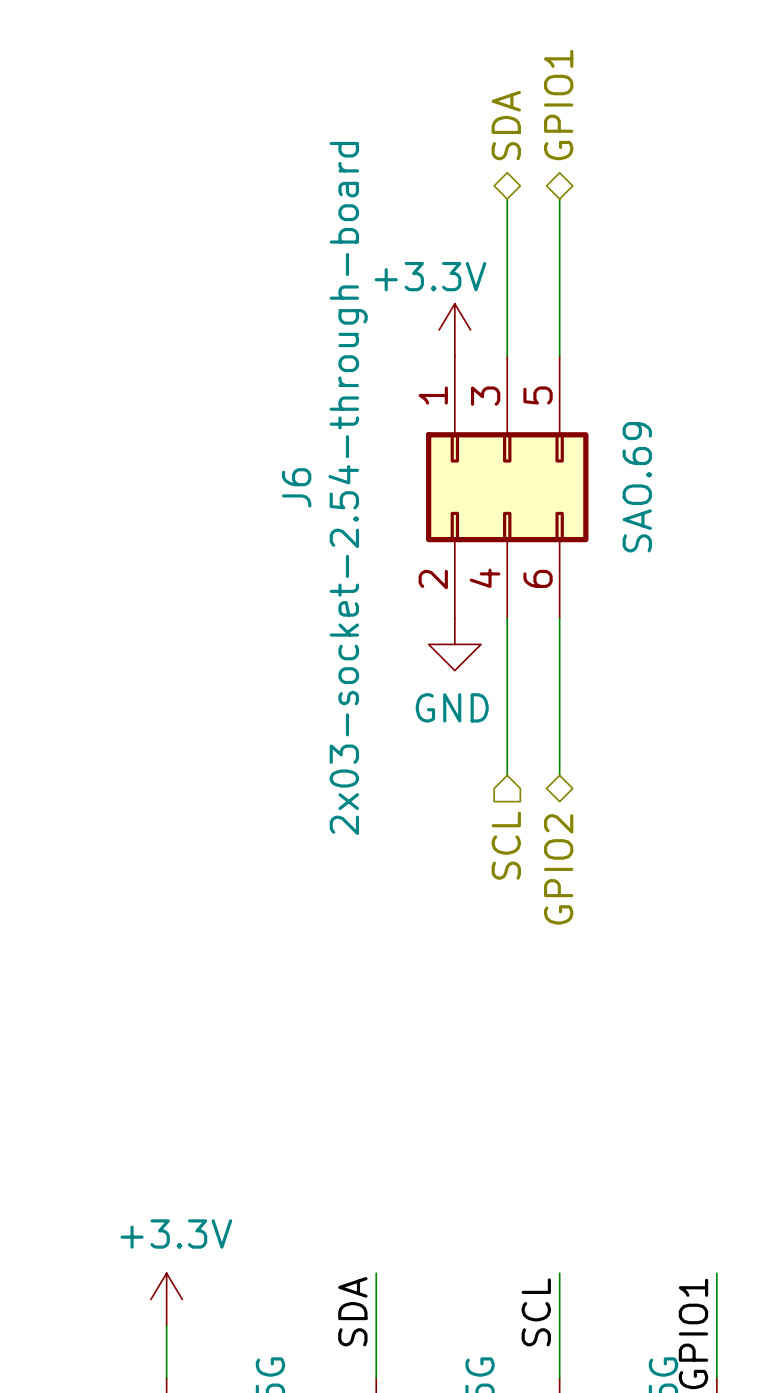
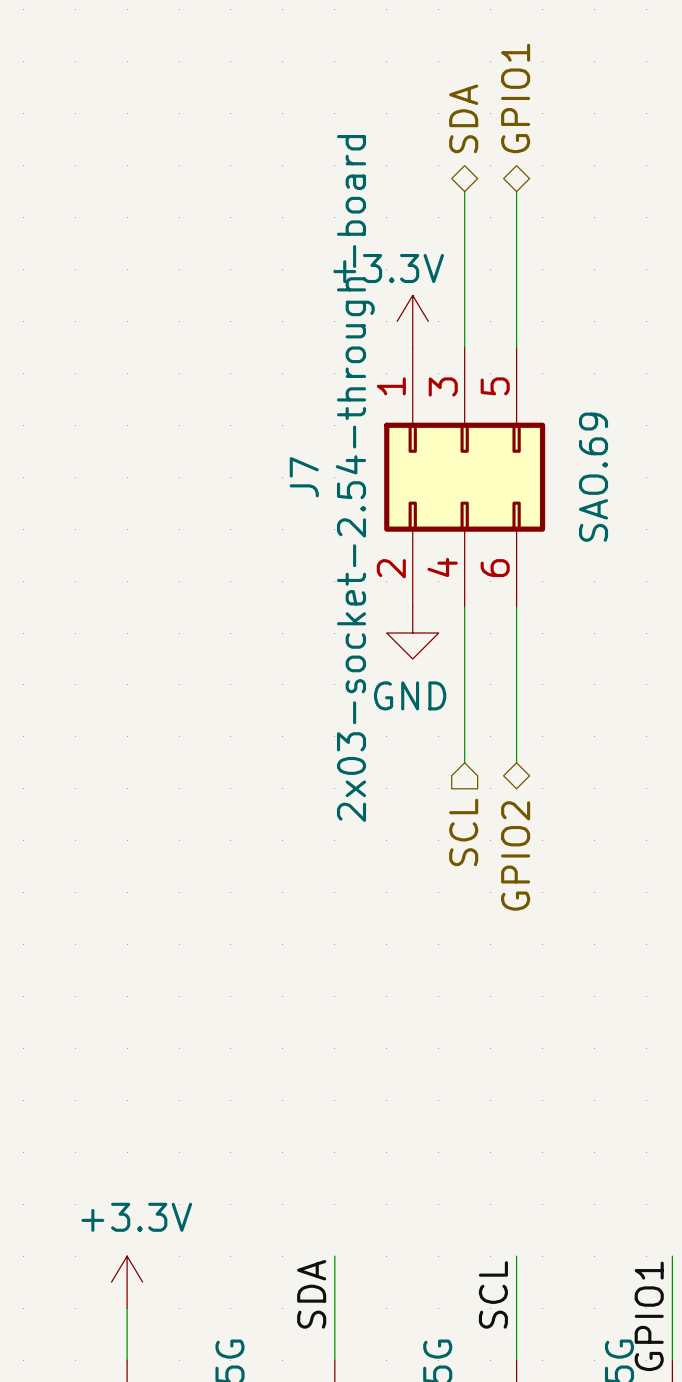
J6 name: J6 (296, 487) -> J7 (304, 477)
J6 value position: 2x03-socket-2.54-through-board (348, 488) -> 2x03-socket-2.54-through-board (355, 478)

